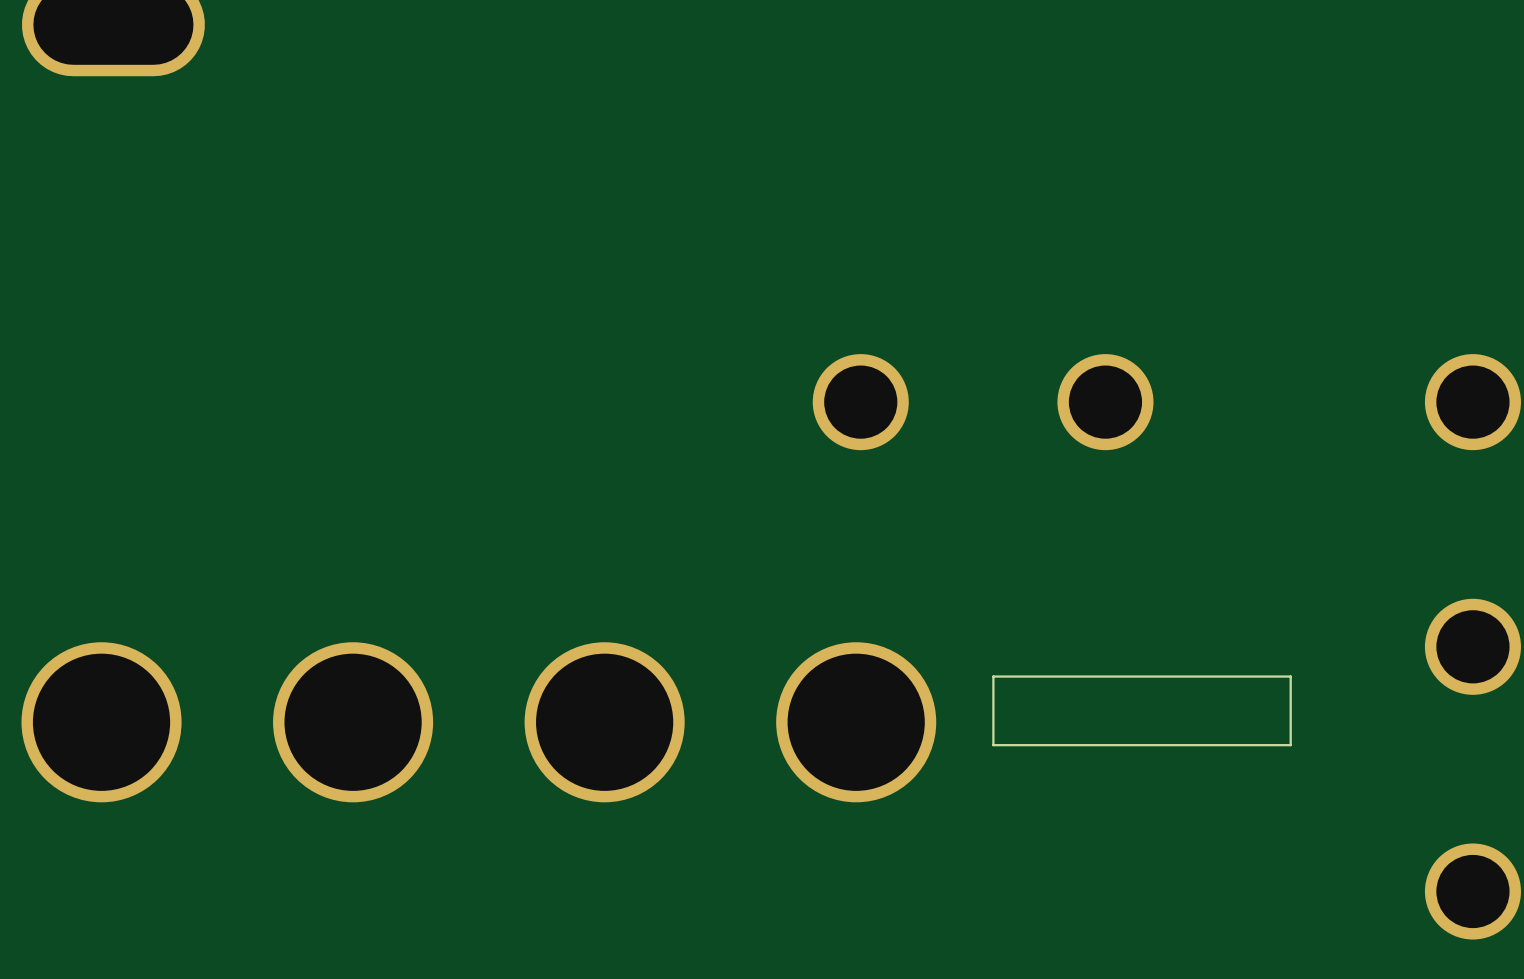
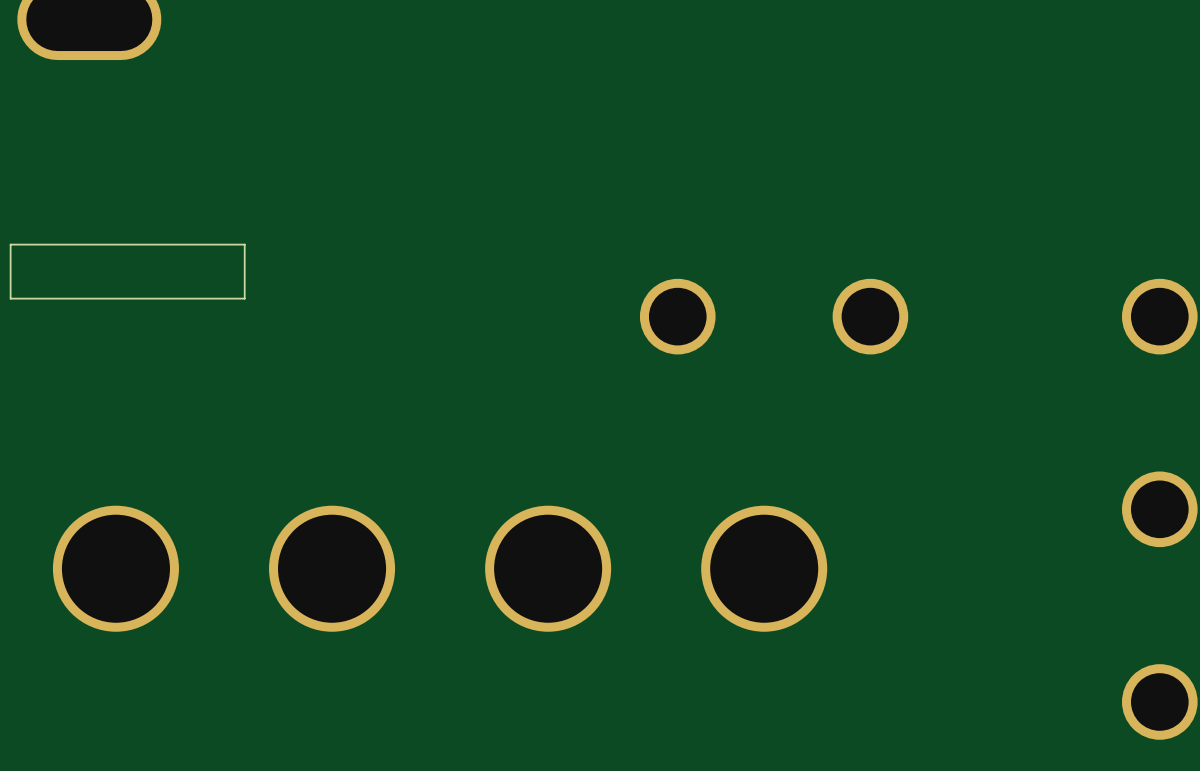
board edge: none -> (244, 244) (10, 244) (10, 298) (244, 298) (244, 244)
board edge: (1290, 676) (993, 676) (993, 745) (1290, 745) (1290, 676) -> none
part position: (101, 722) -> (115, 568)
part position: (353, 722) -> (332, 568)
part: (604, 722) -> none
part: none -> (548, 568)
part: (856, 722) -> none
part: none -> (764, 568)

